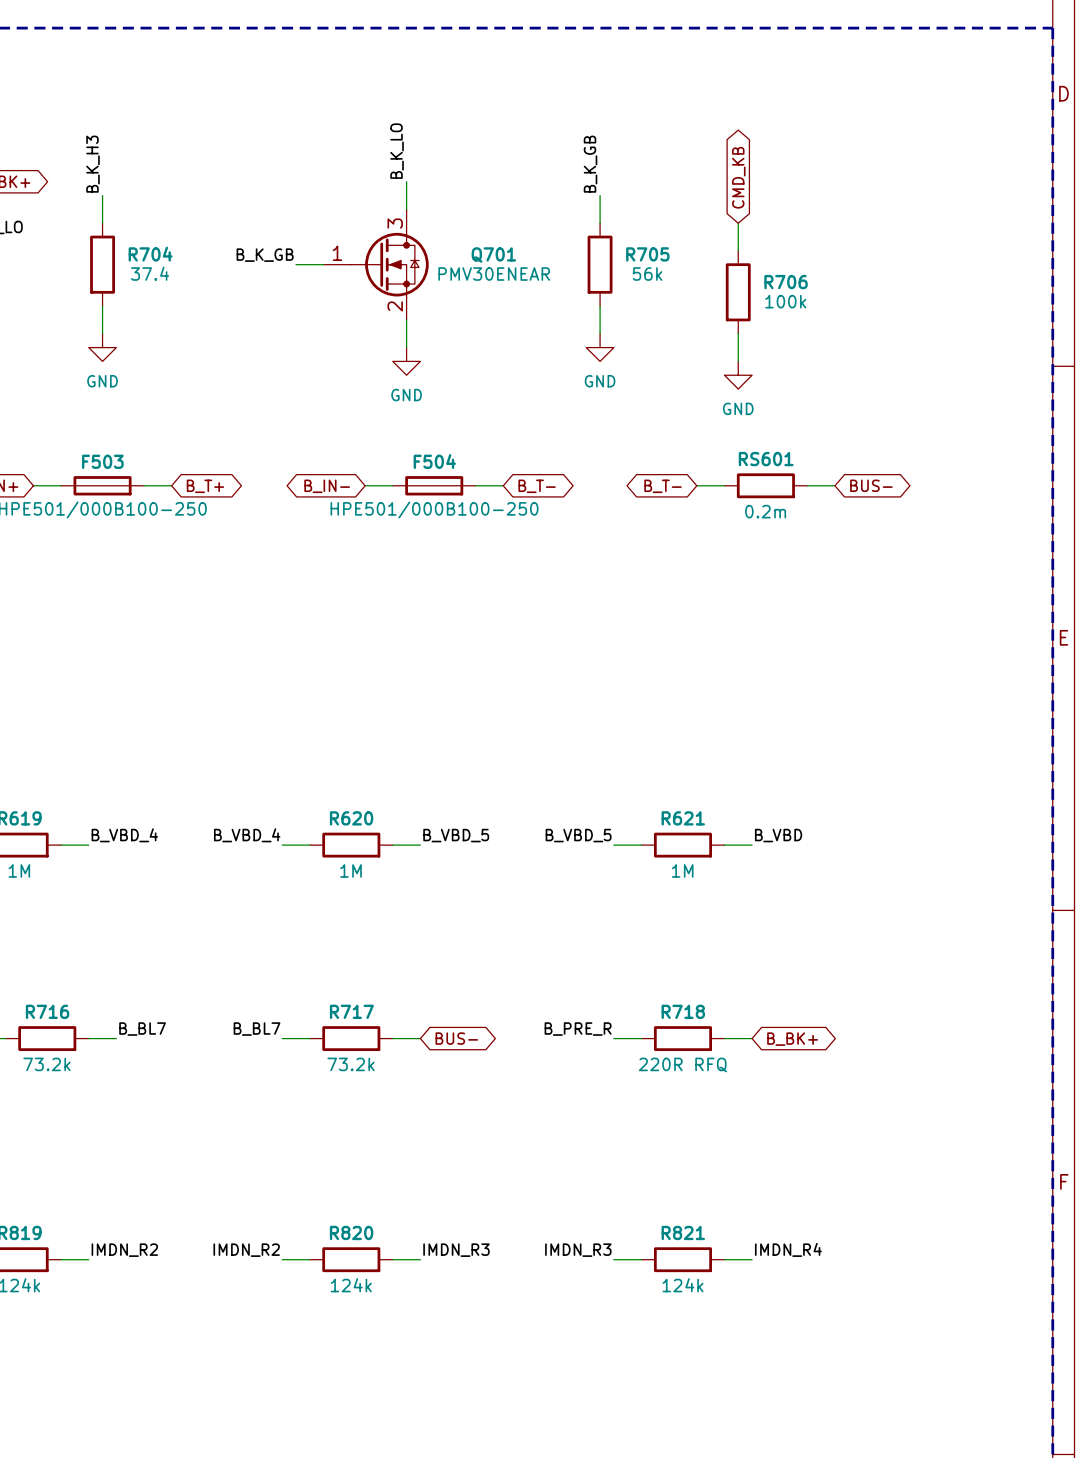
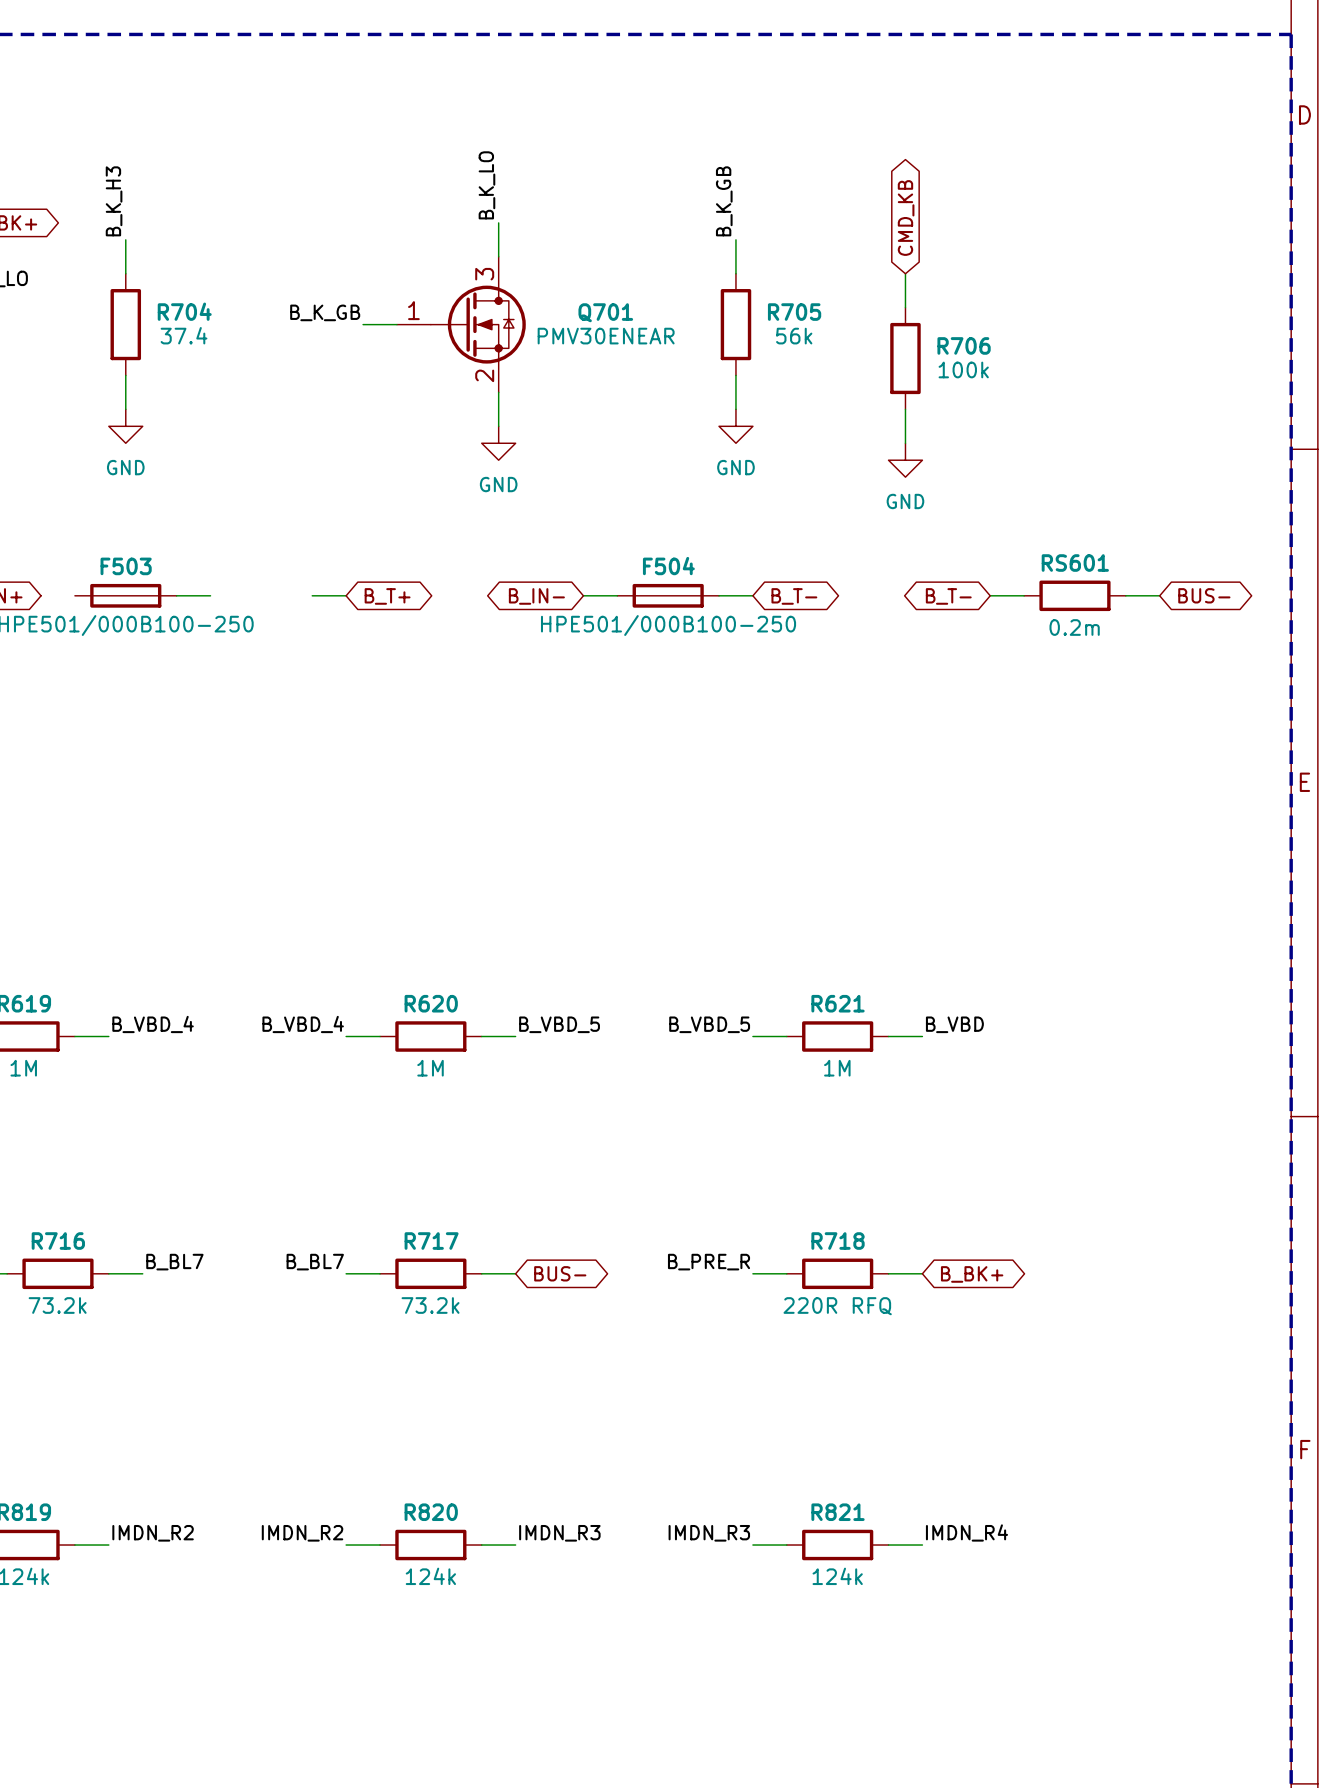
wire: (33, 485) (61, 485) -> (312, 595) (346, 595)
wire: (365, 485) (392, 485) -> (719, 595) (752, 595)
F504 position: (434, 485) -> (668, 595)
wire: (696, 485) (724, 485) -> (1125, 595) (1159, 595)
RS601 position: (765, 485) -> (1074, 595)
global label position: BUS- (871, 485) -> BUS- (1204, 595)
global label position: B_T+ (205, 486) -> B_T+ (387, 596)
global label position: B_IN- (327, 486) -> B_IN- (536, 596)
global label: B_T- (537, 486) -> none
global label rotation: 0° (663, 486) -> 180° (794, 596)
global label: none -> B_T- (948, 596)

